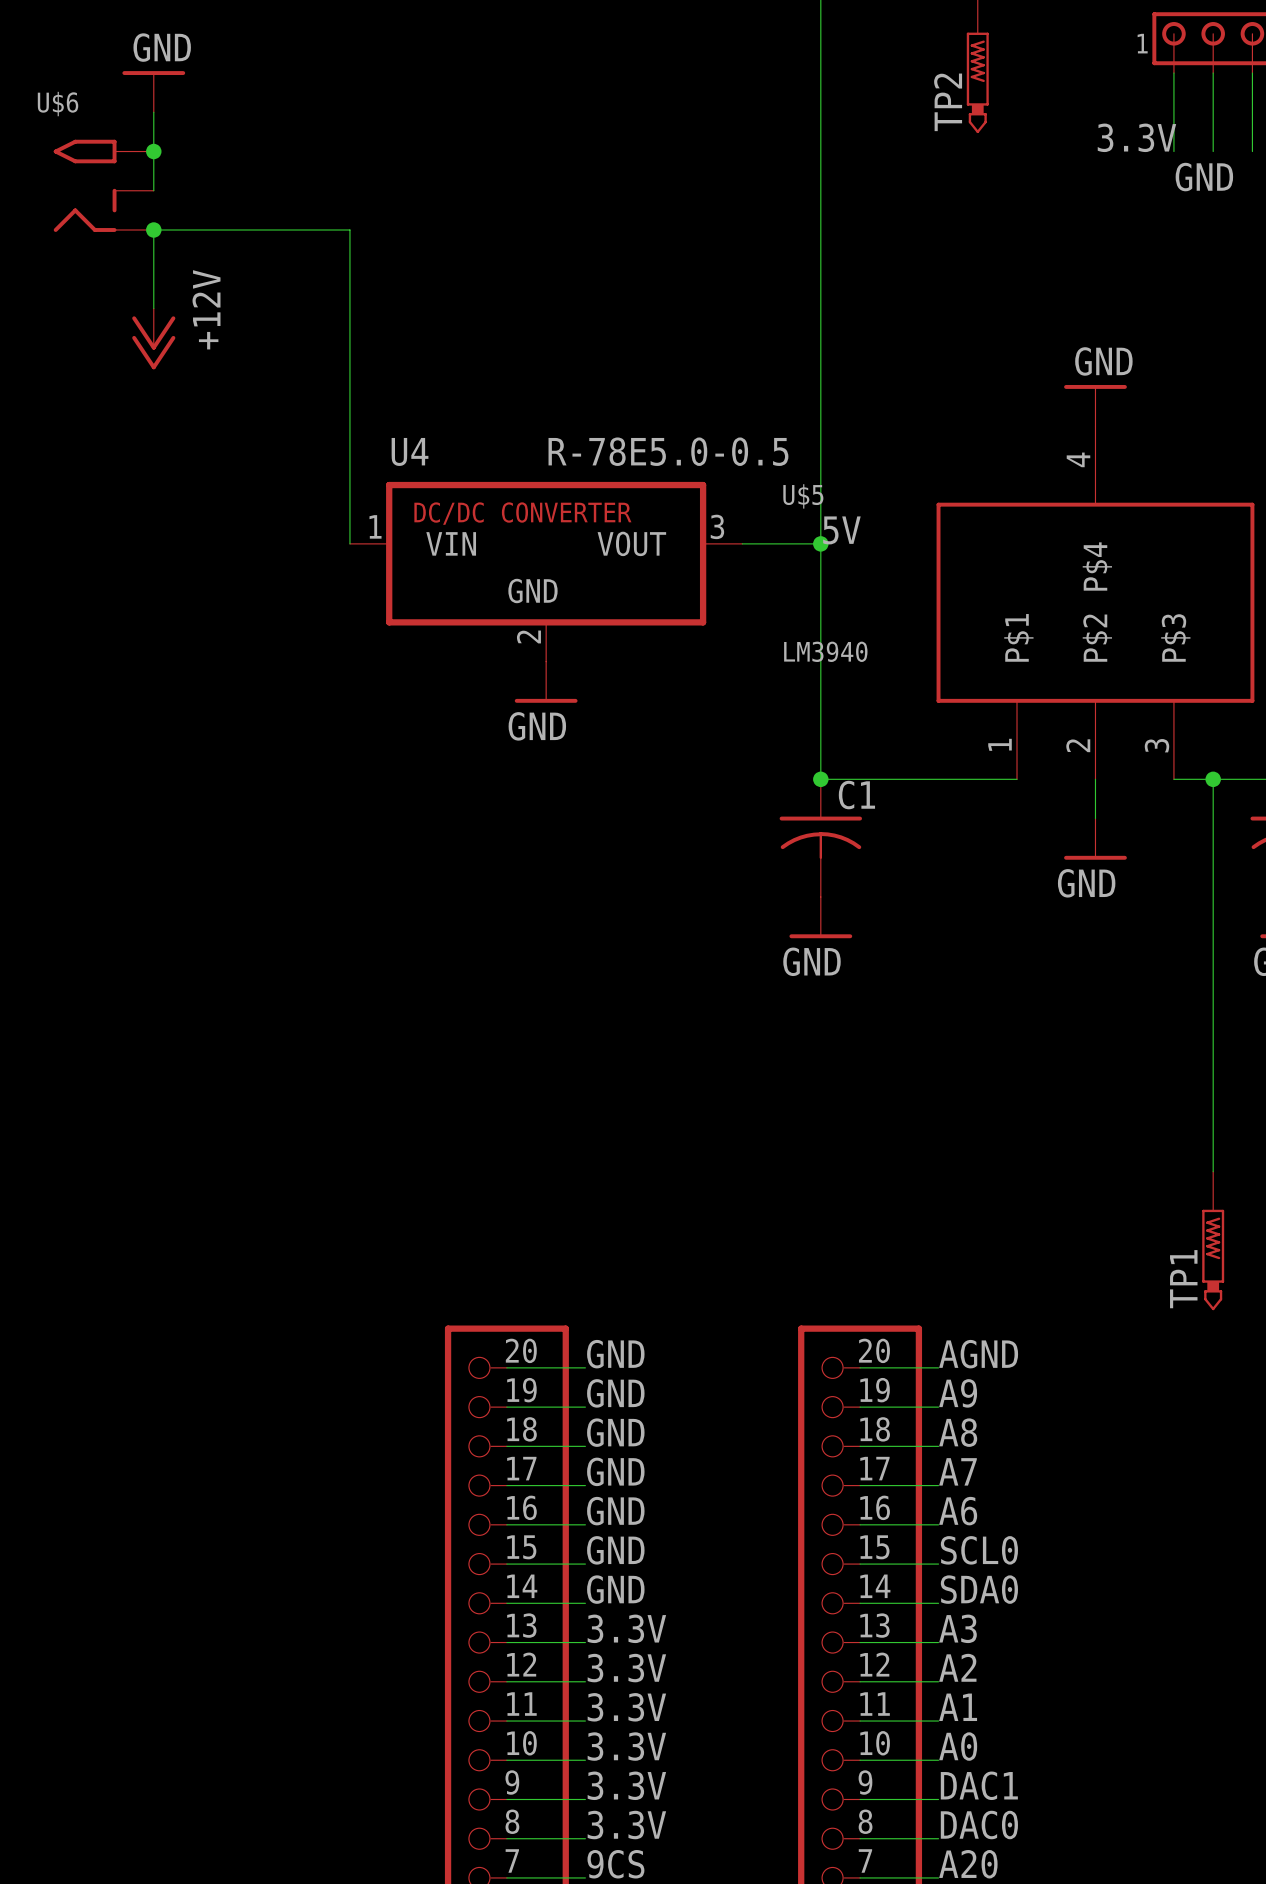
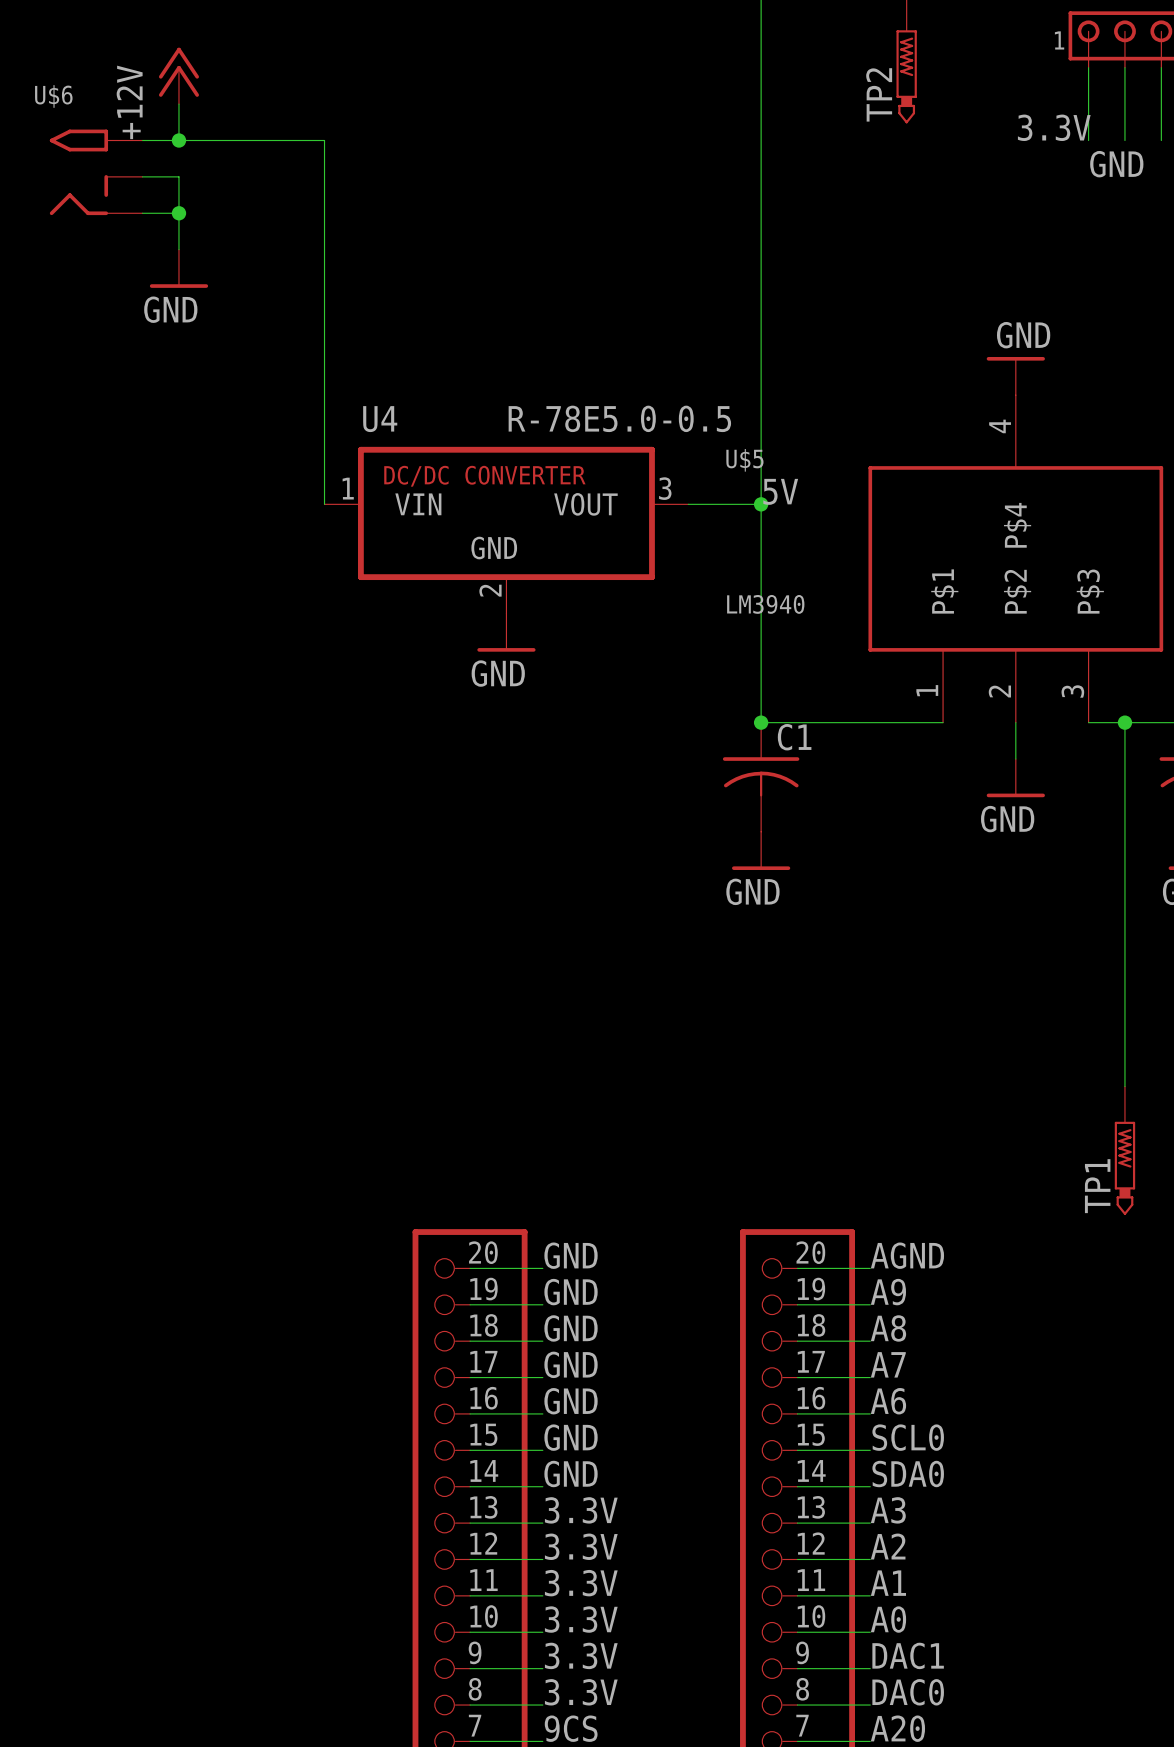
power symbol rotation: 0° (153, 73) -> 180° (178, 286)
power symbol position: GND (153, 91) -> GND (178, 268)
wire: (153, 112) (153, 190) -> (178, 249) (178, 176) (142, 176)
wire: none -> (178, 104) (178, 140)
junction position: (153, 151) -> (178, 140)
wire: (153, 229) (153, 308) -> none
junction position: (153, 229) -> (178, 213)
wire: (193, 229) (349, 229) -> (142, 140) (324, 140) (324, 213)
power symbol position: +12V (153, 338) -> +12V (178, 75)
power symbol rotation: 0° (153, 342) -> 180° (178, 72)

